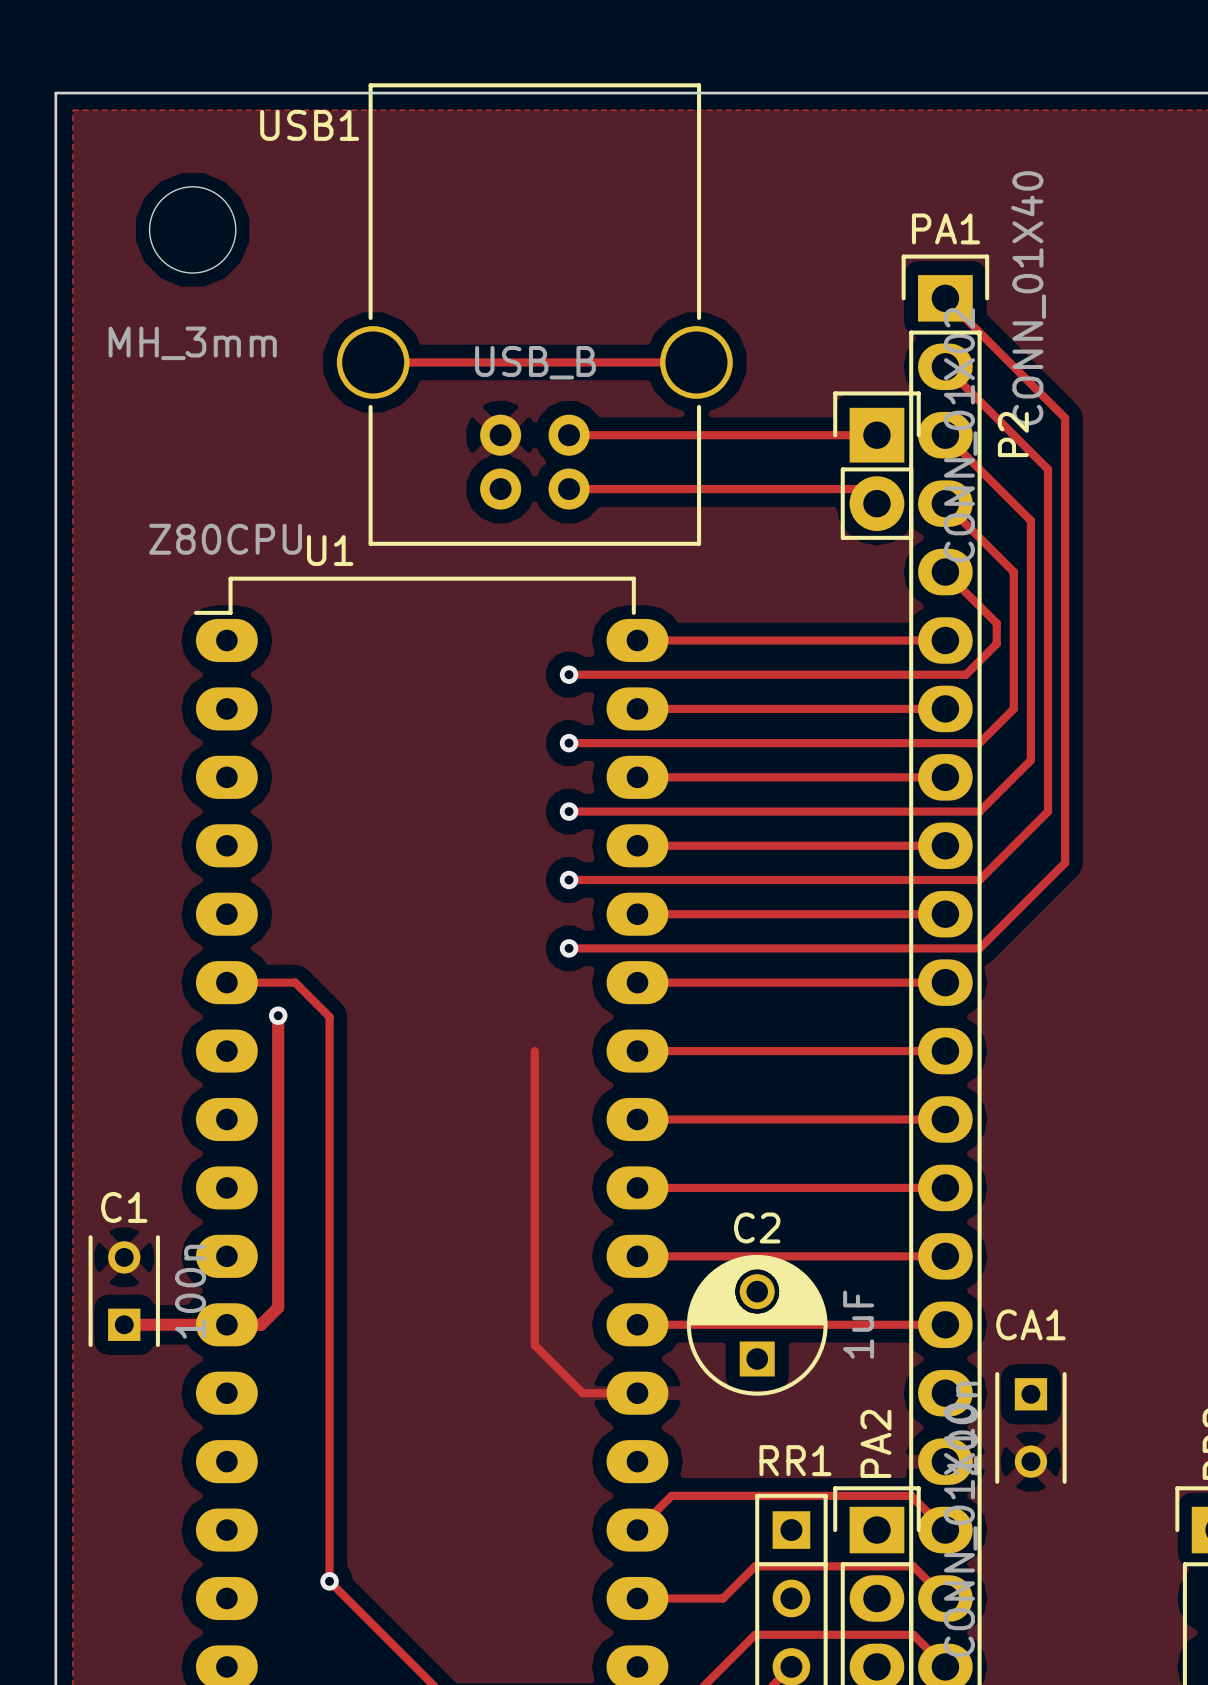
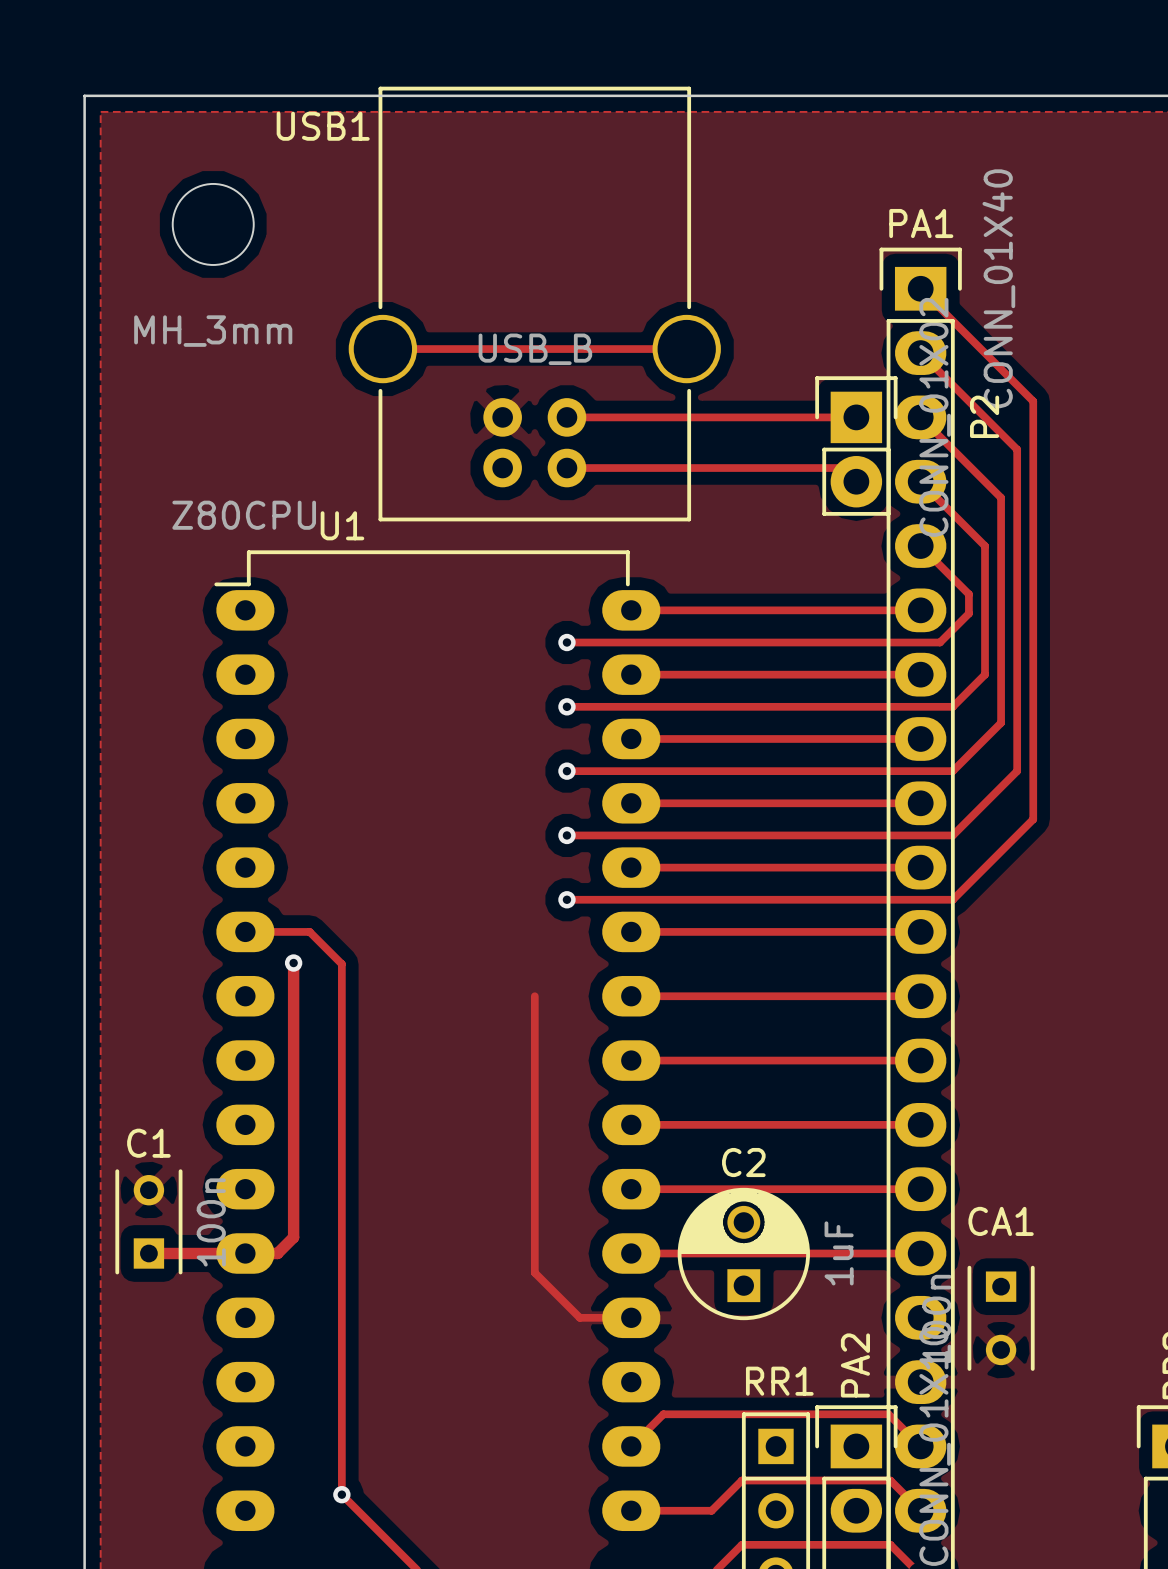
CA1 position: (1030, 1427) -> (1001, 1318)

